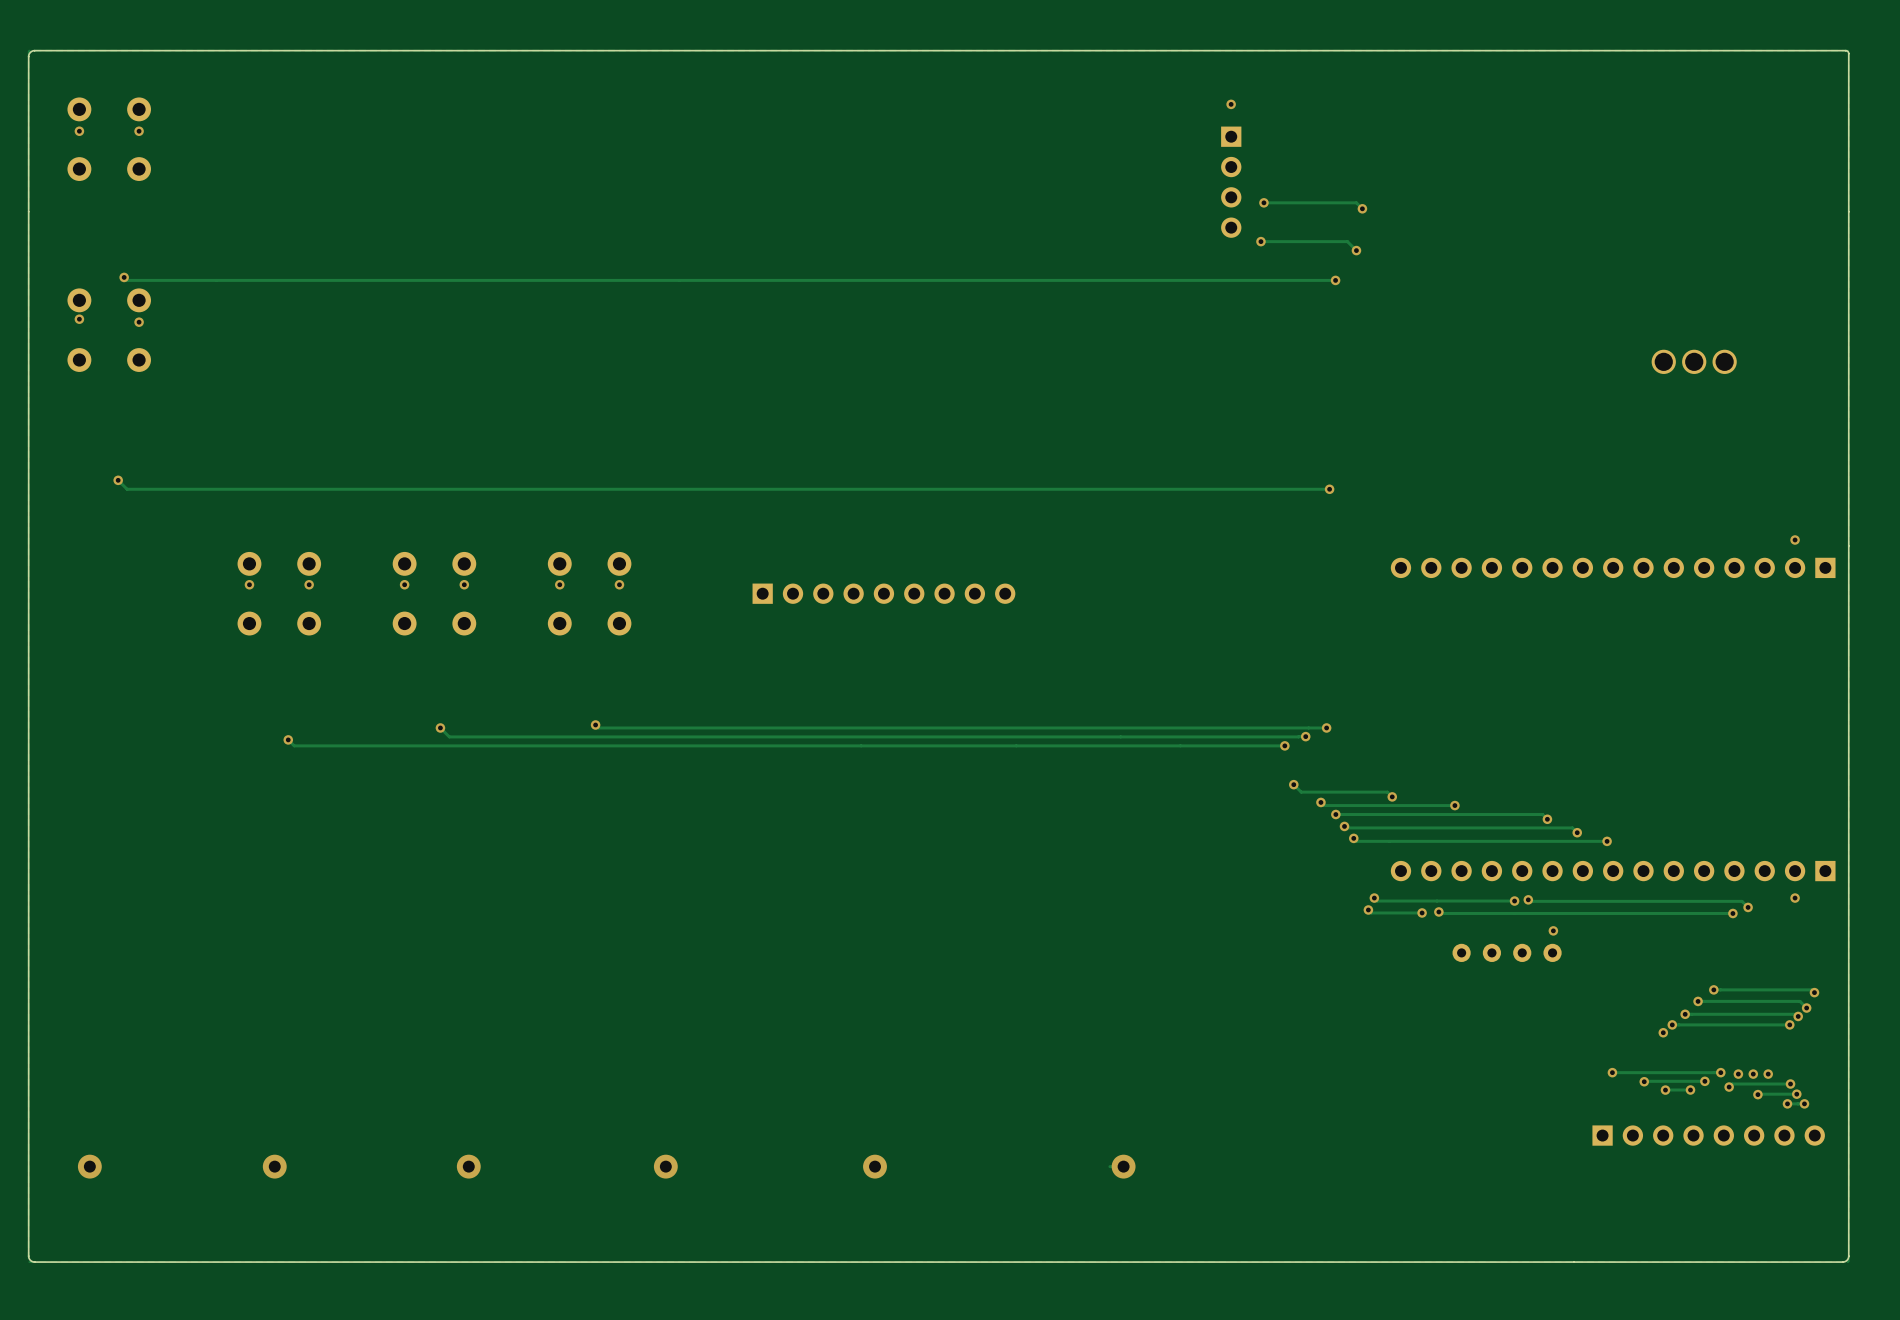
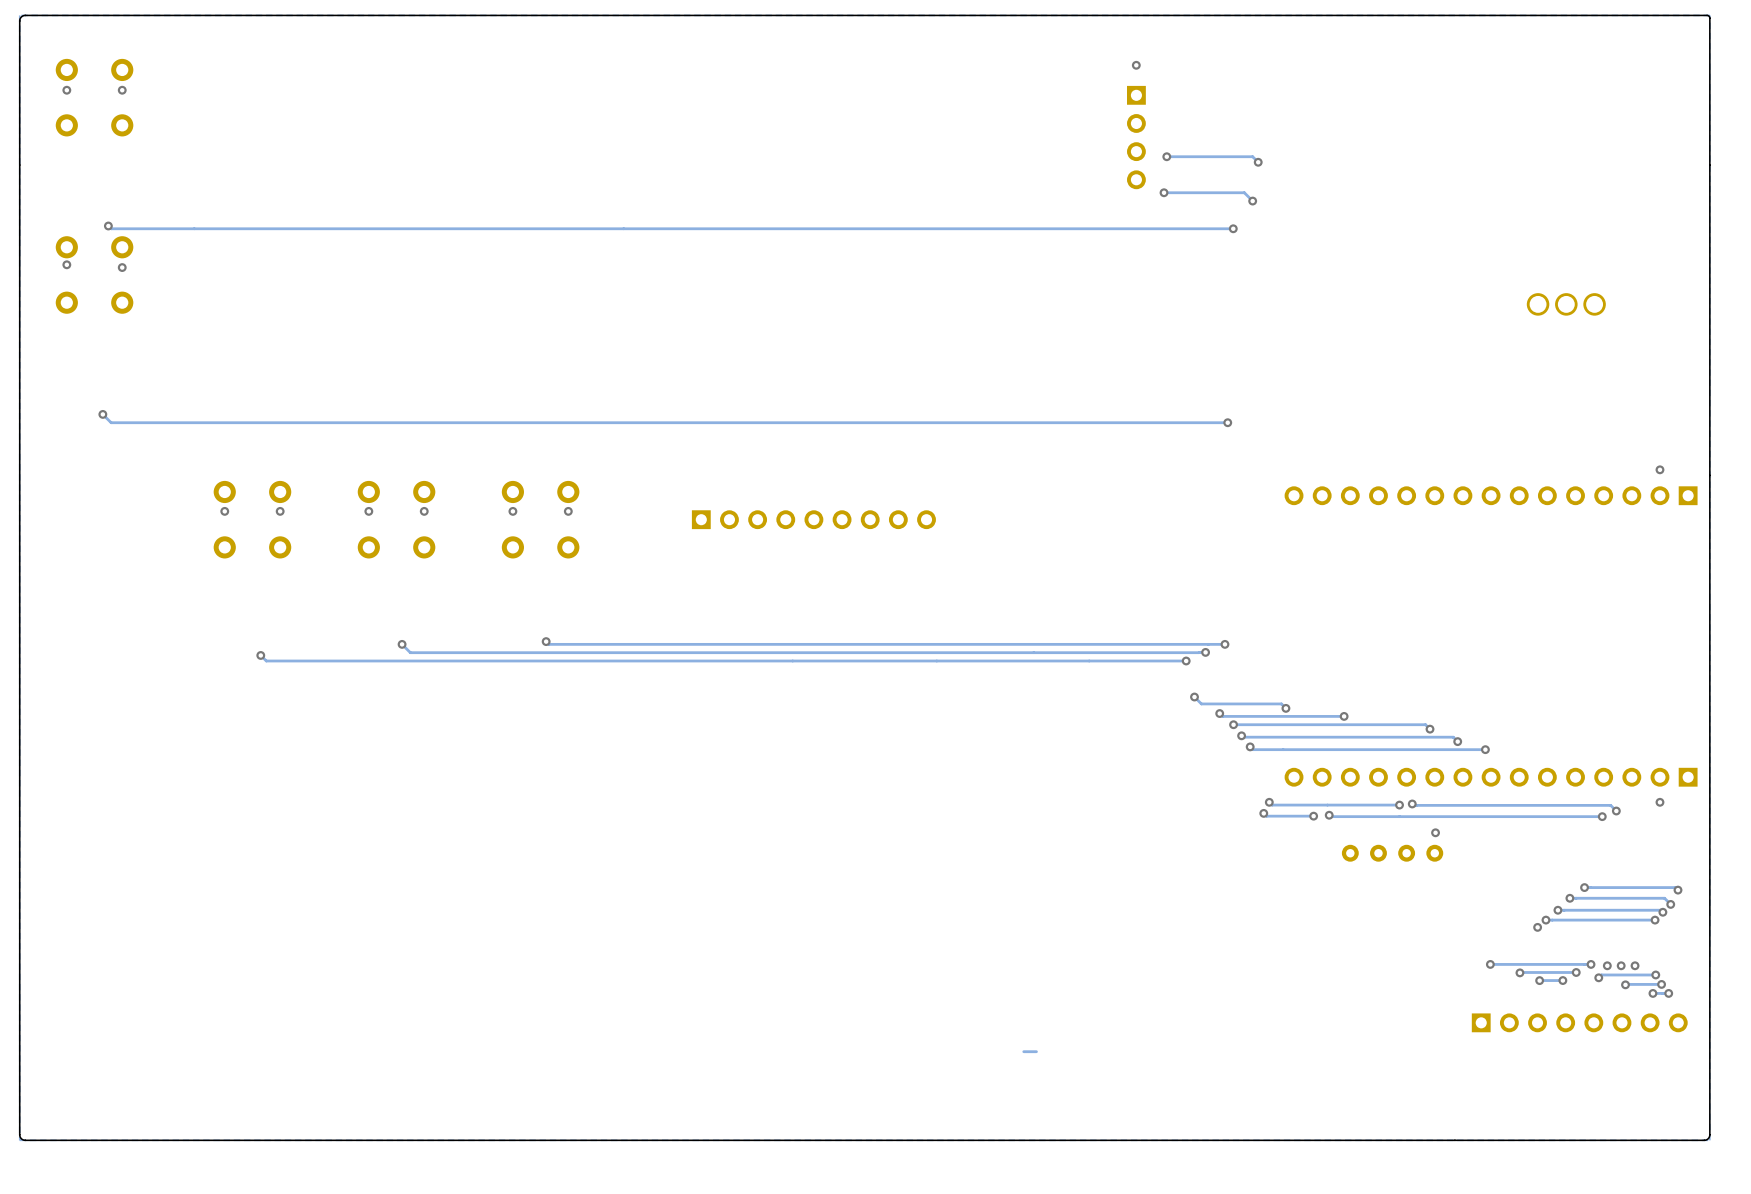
via: (89, 1166) -> none
via: (274, 1166) -> none
via: (468, 1166) -> none
via: (665, 1166) -> none
via: (875, 1166) -> none
via: (1123, 1166) -> none

